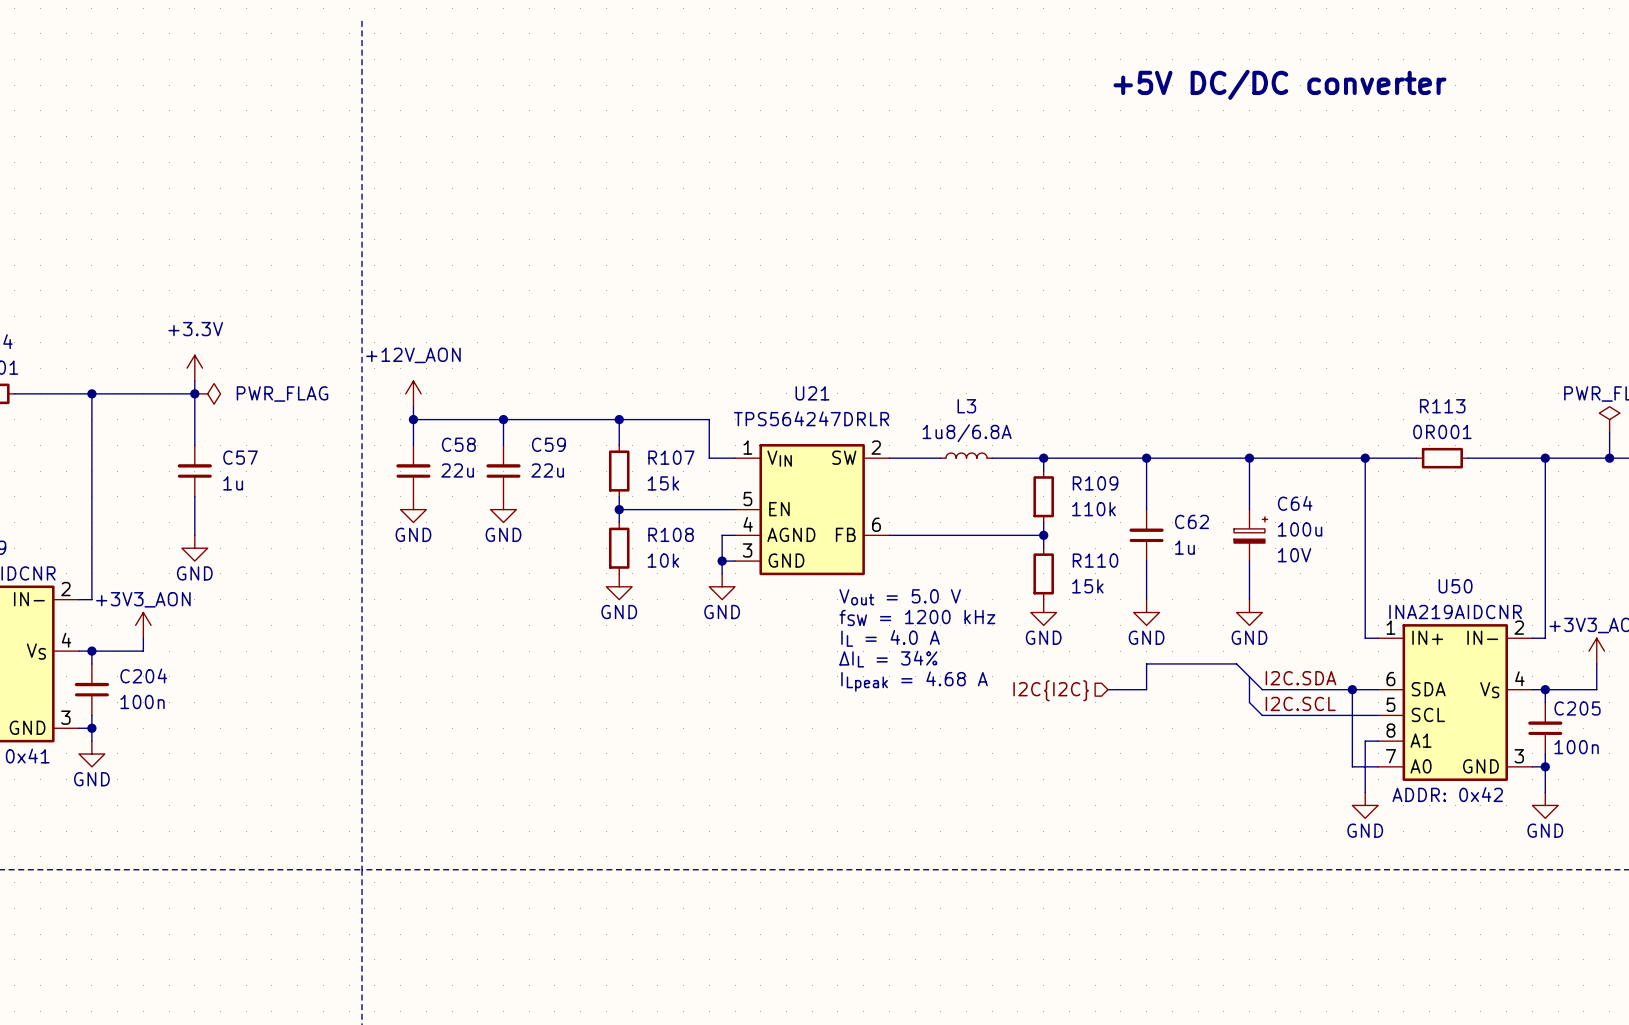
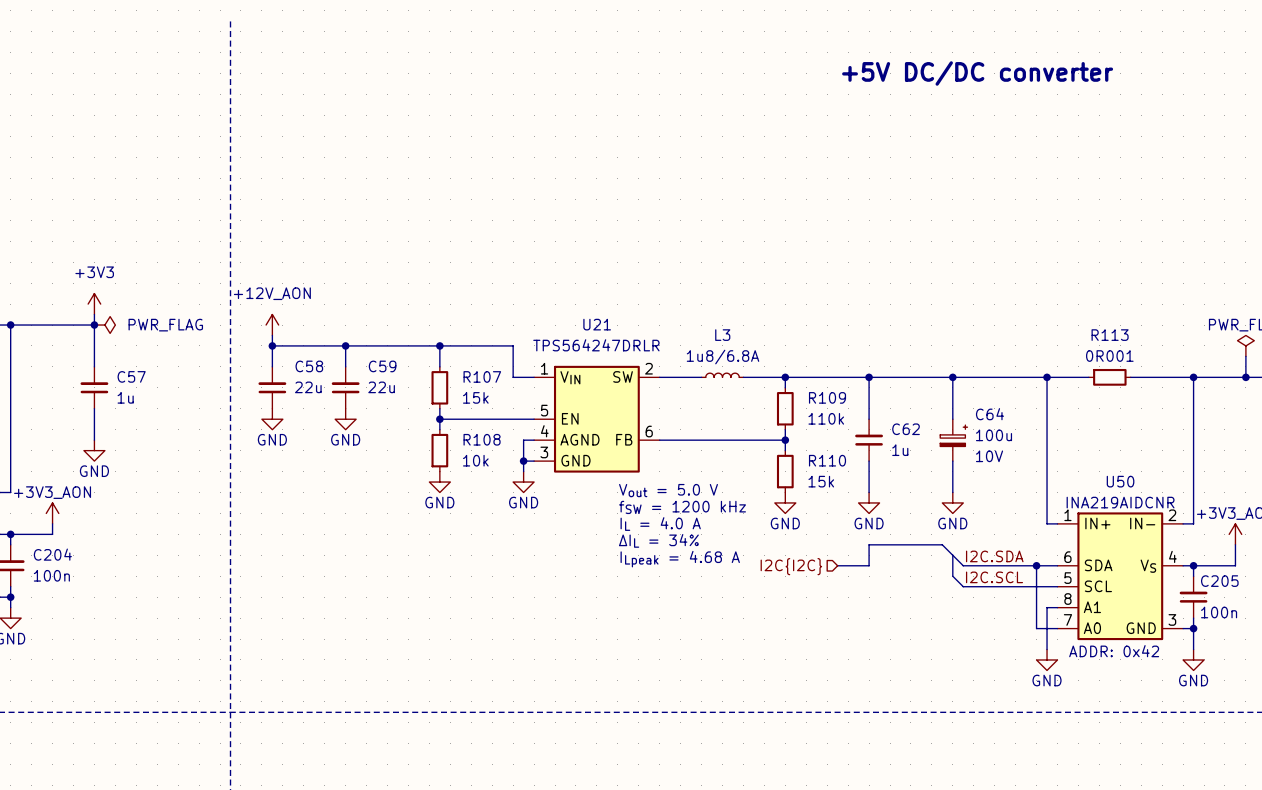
power symbol: +3.3V (194, 368) -> +3V3 (94, 304)

